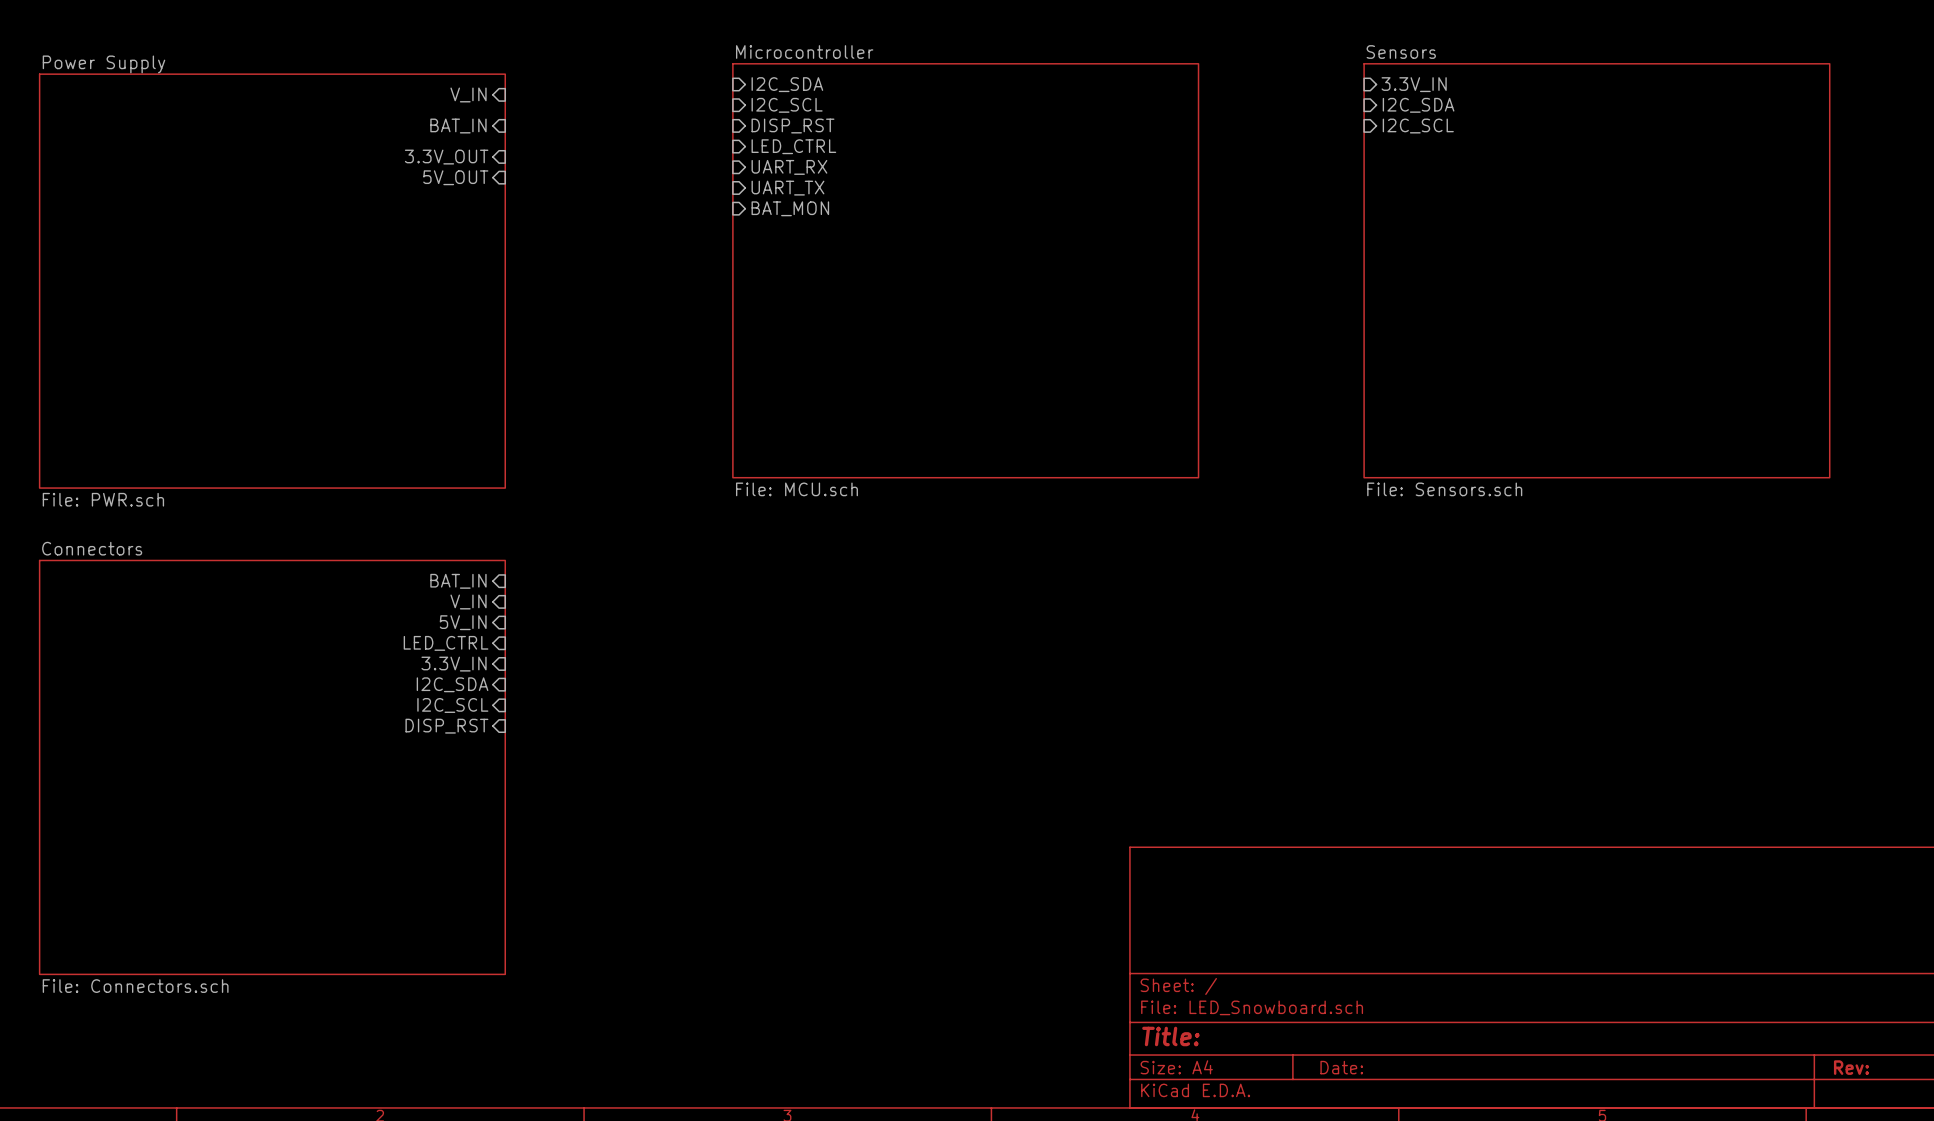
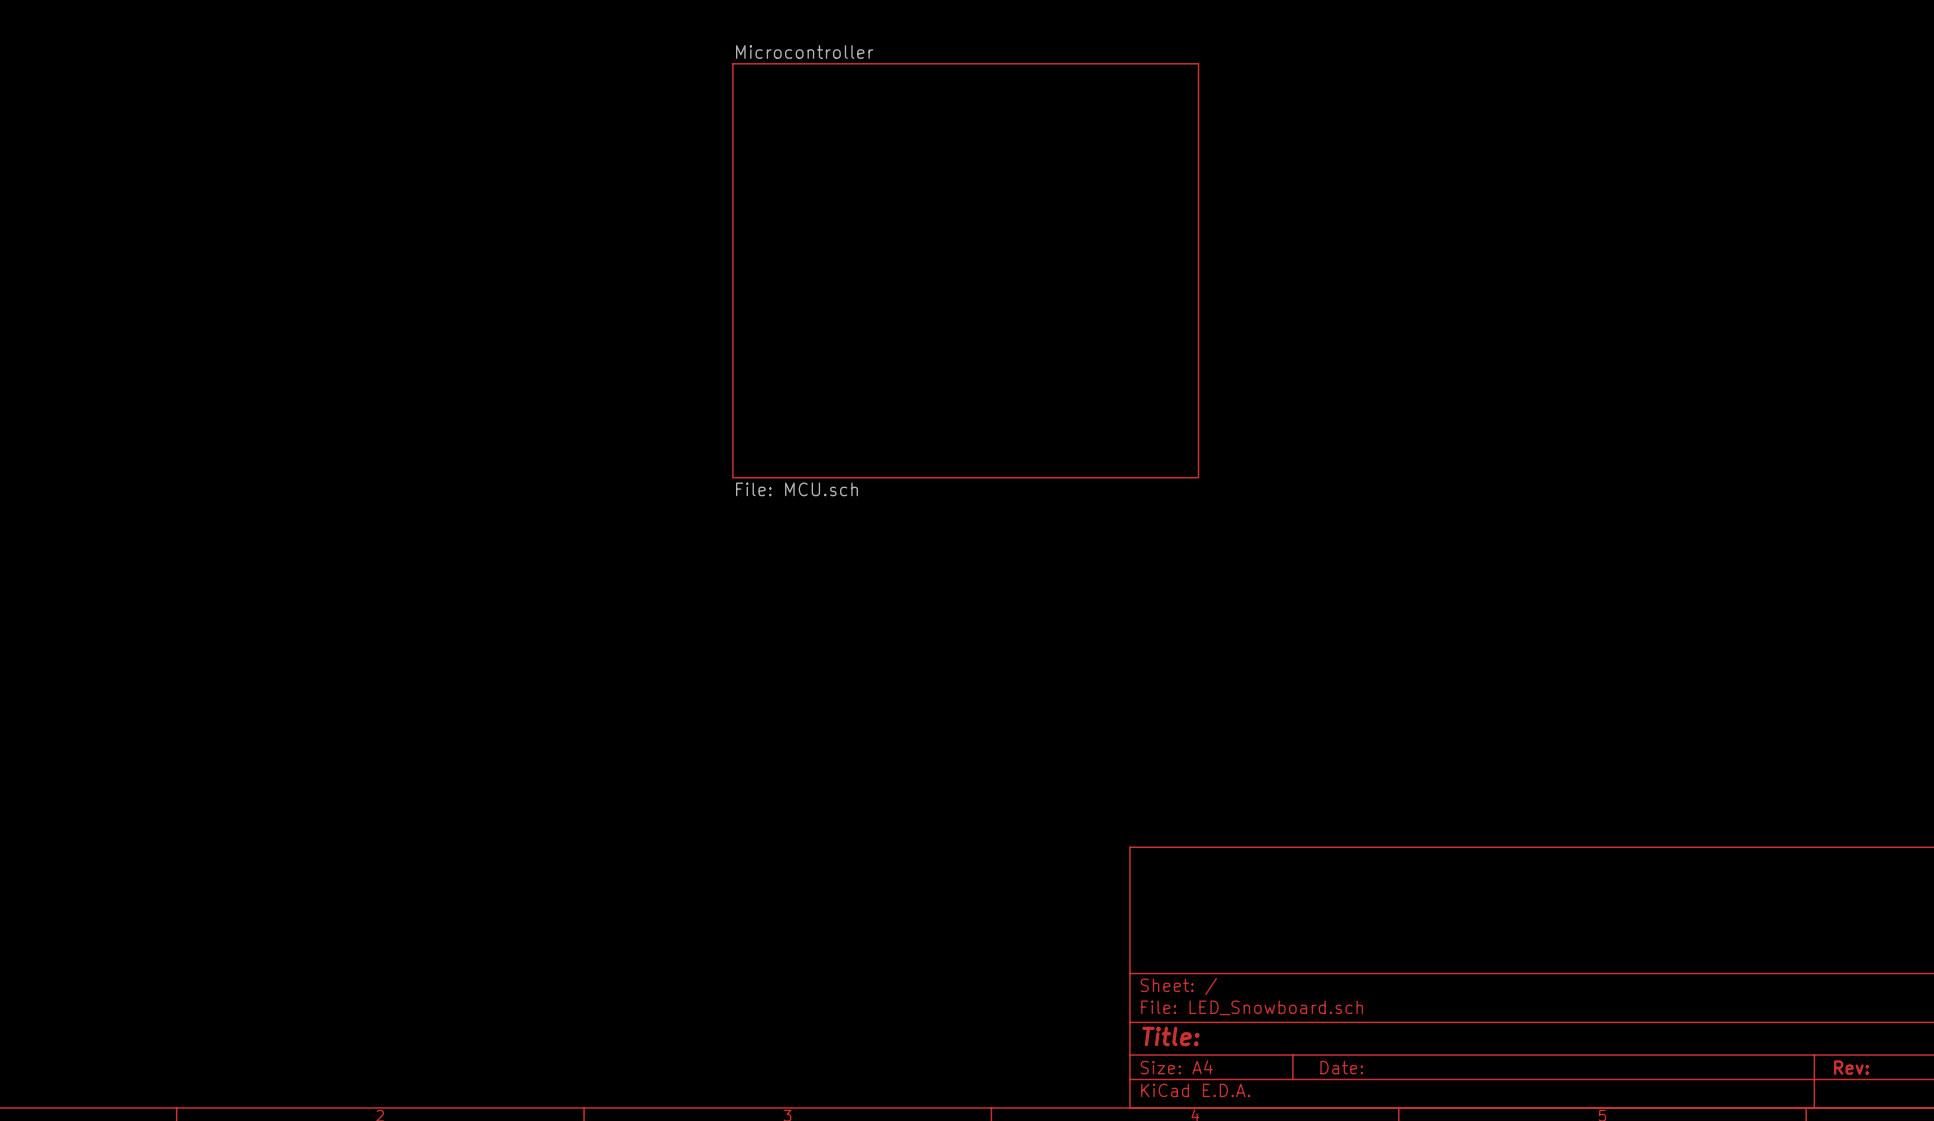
sheet pin: I2C_SDA (787, 84) -> none
sheet pin: 3.3V_IN (1414, 84) -> none
sheet pin: V_IN (468, 94) -> none
sheet pin: I2C_SCL (787, 105) -> none
sheet pin: I2C_SDA (1418, 105) -> none
sheet pin: BAT_IN (458, 126) -> none
sheet pin: DISP_RST (792, 126) -> none
sheet pin: I2C_SCL (1418, 126) -> none
sheet pin: LED_CTRL (793, 146) -> none
sheet pin: 3.3V_OUT (446, 157) -> none
sheet pin: UART_RX (789, 167) -> none
sheet pin: 5V_OUT (455, 177) -> none
sheet pin: UART_TX (787, 188) -> none
sheet pin: BAT_MON (790, 208) -> none
sheet Sensors: File: Sensors.sch (1596, 270) -> none
sheet Power Supply: File: PWR.sch (272, 281) -> none
sheet pin: BAT_IN (458, 581) -> none
sheet pin: V_IN (468, 602) -> none
sheet pin: 5V_IN (463, 622) -> none
sheet pin: LED_CTRL (446, 643) -> none
sheet pin: 3.3V_IN (454, 664) -> none
sheet pin: I2C_SDA (452, 684) -> none
sheet pin: I2C_SCL (452, 705) -> none
sheet pin: DISP_RST (446, 726) -> none
sheet Connectors: File: Connectors.sch (272, 767) -> none

